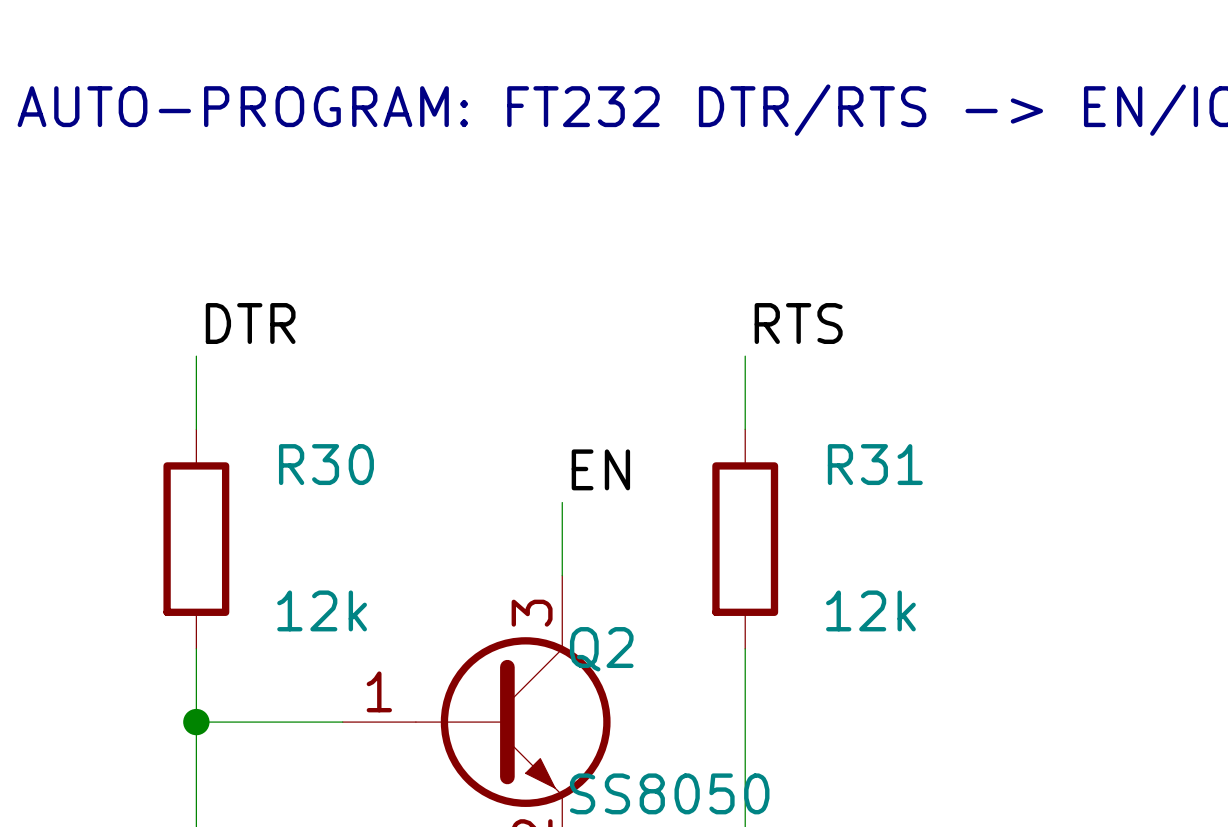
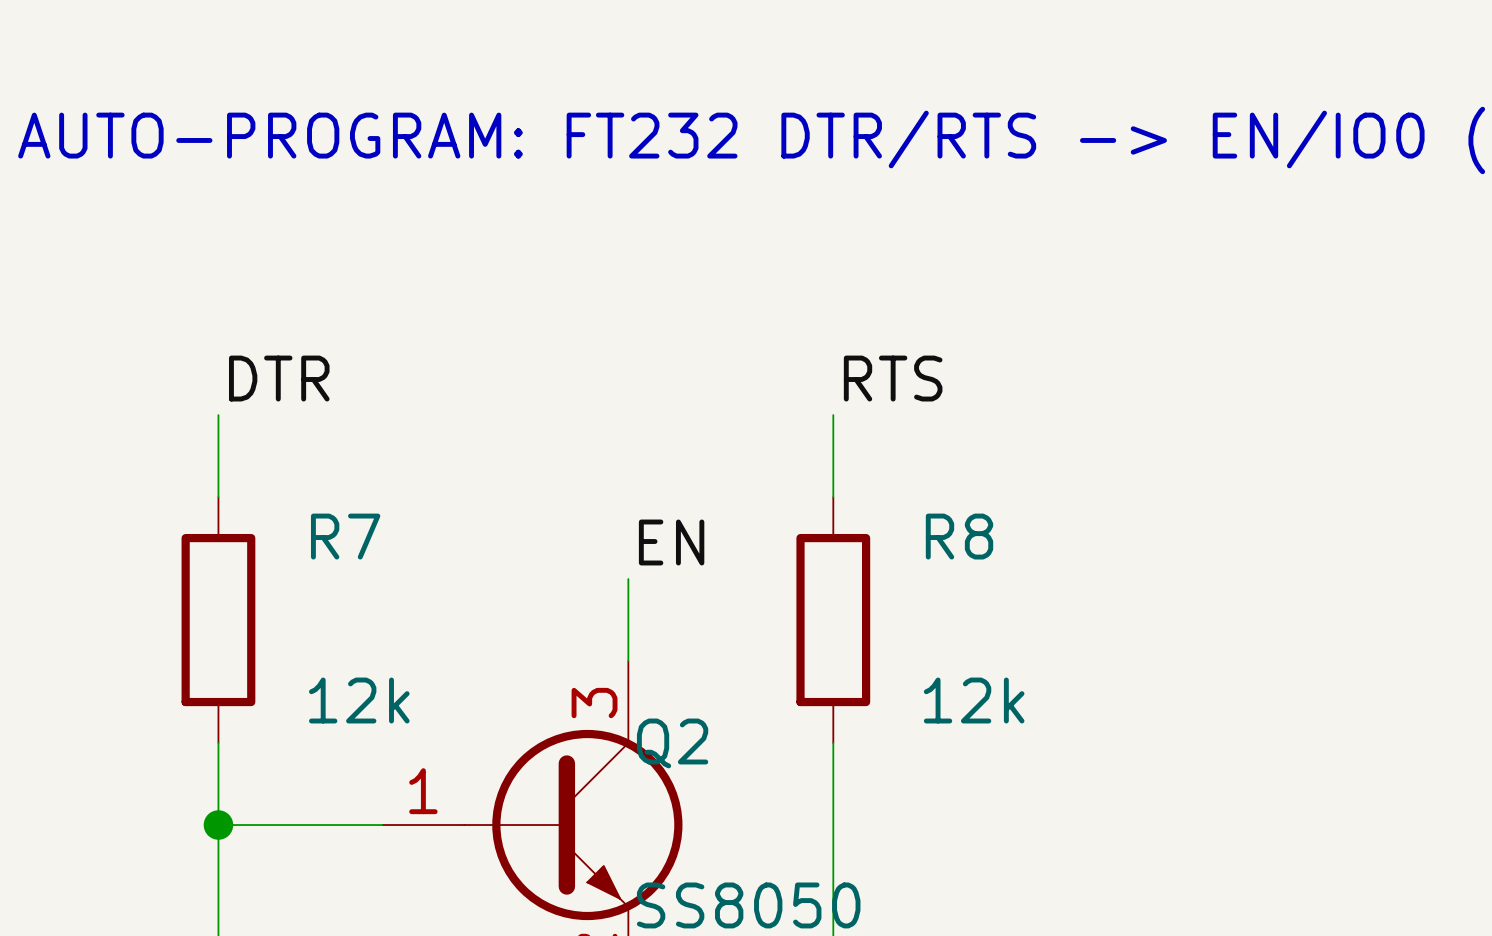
R30 name: R30 (326, 464) -> R7 (345, 536)
R31 name: R31 (875, 464) -> R8 (959, 536)

